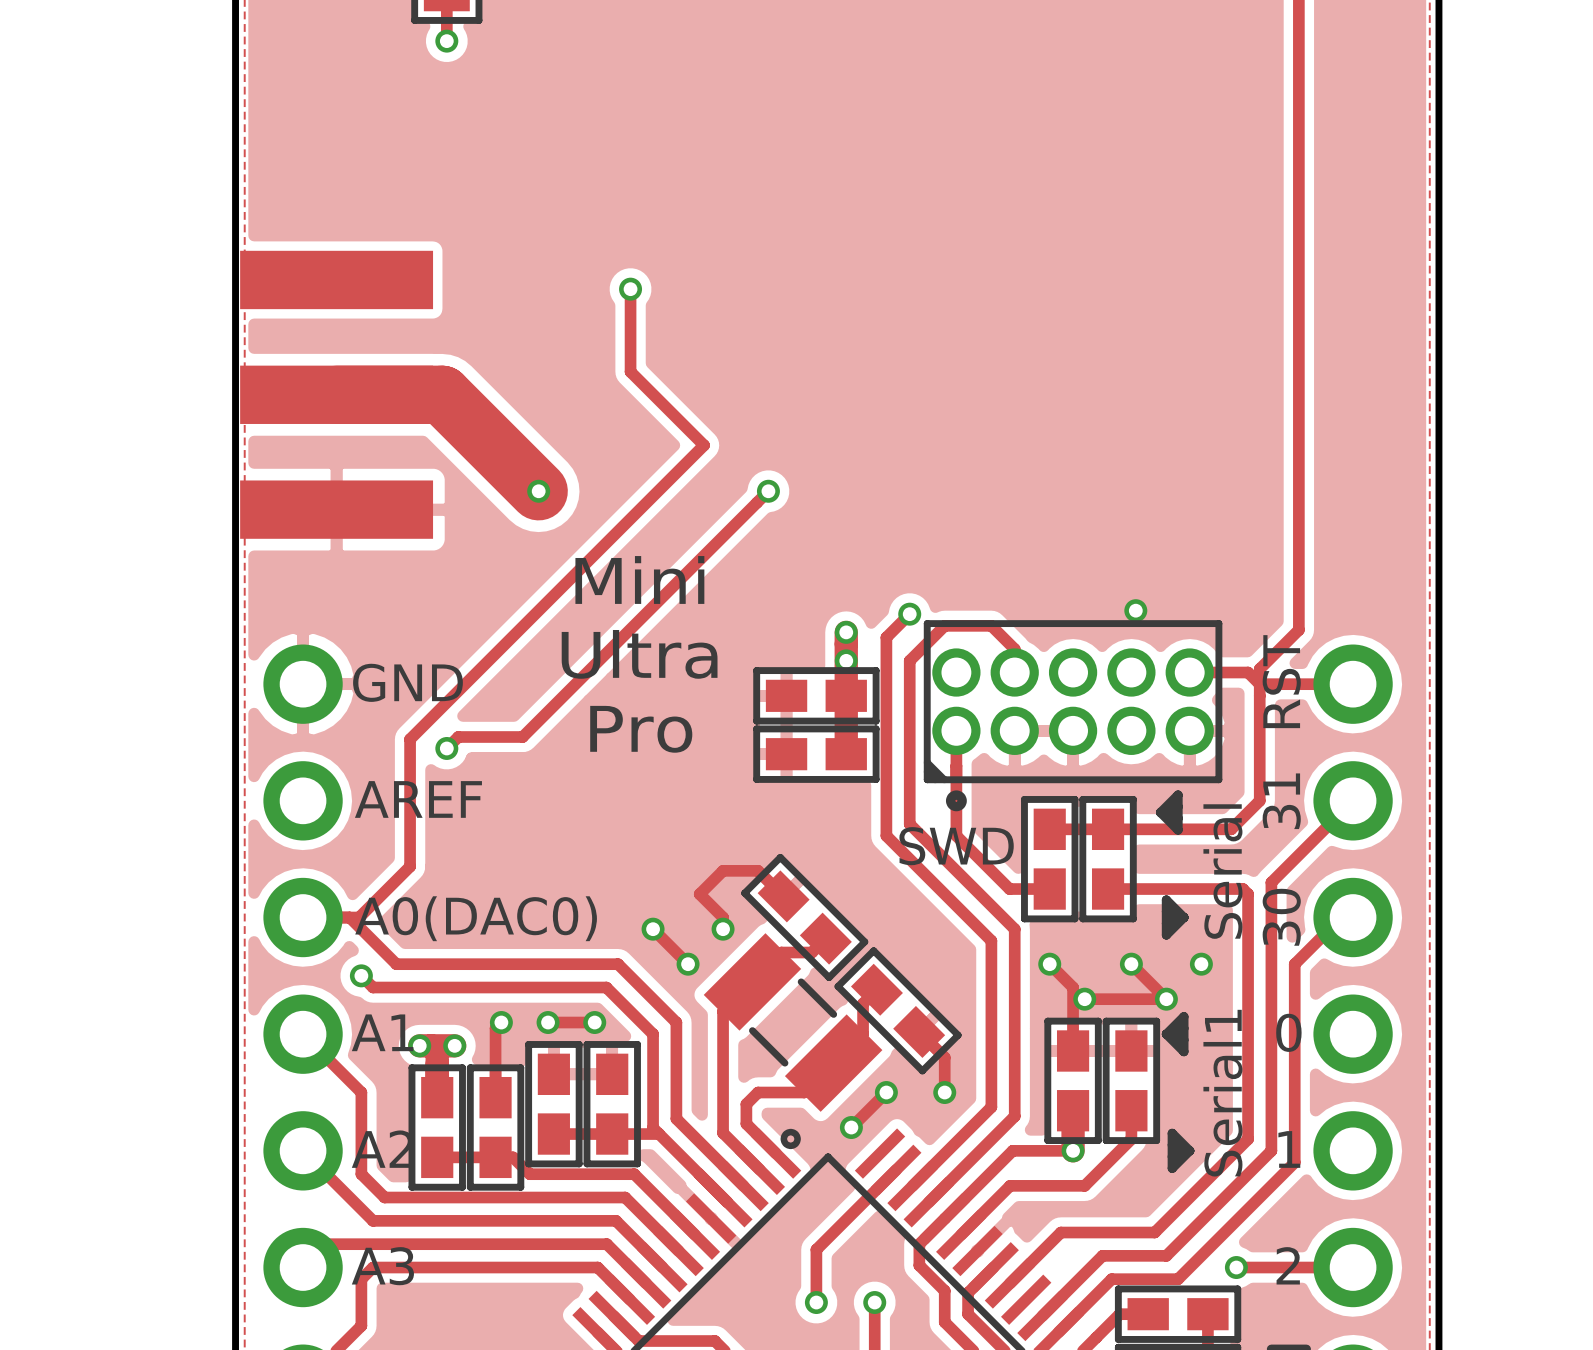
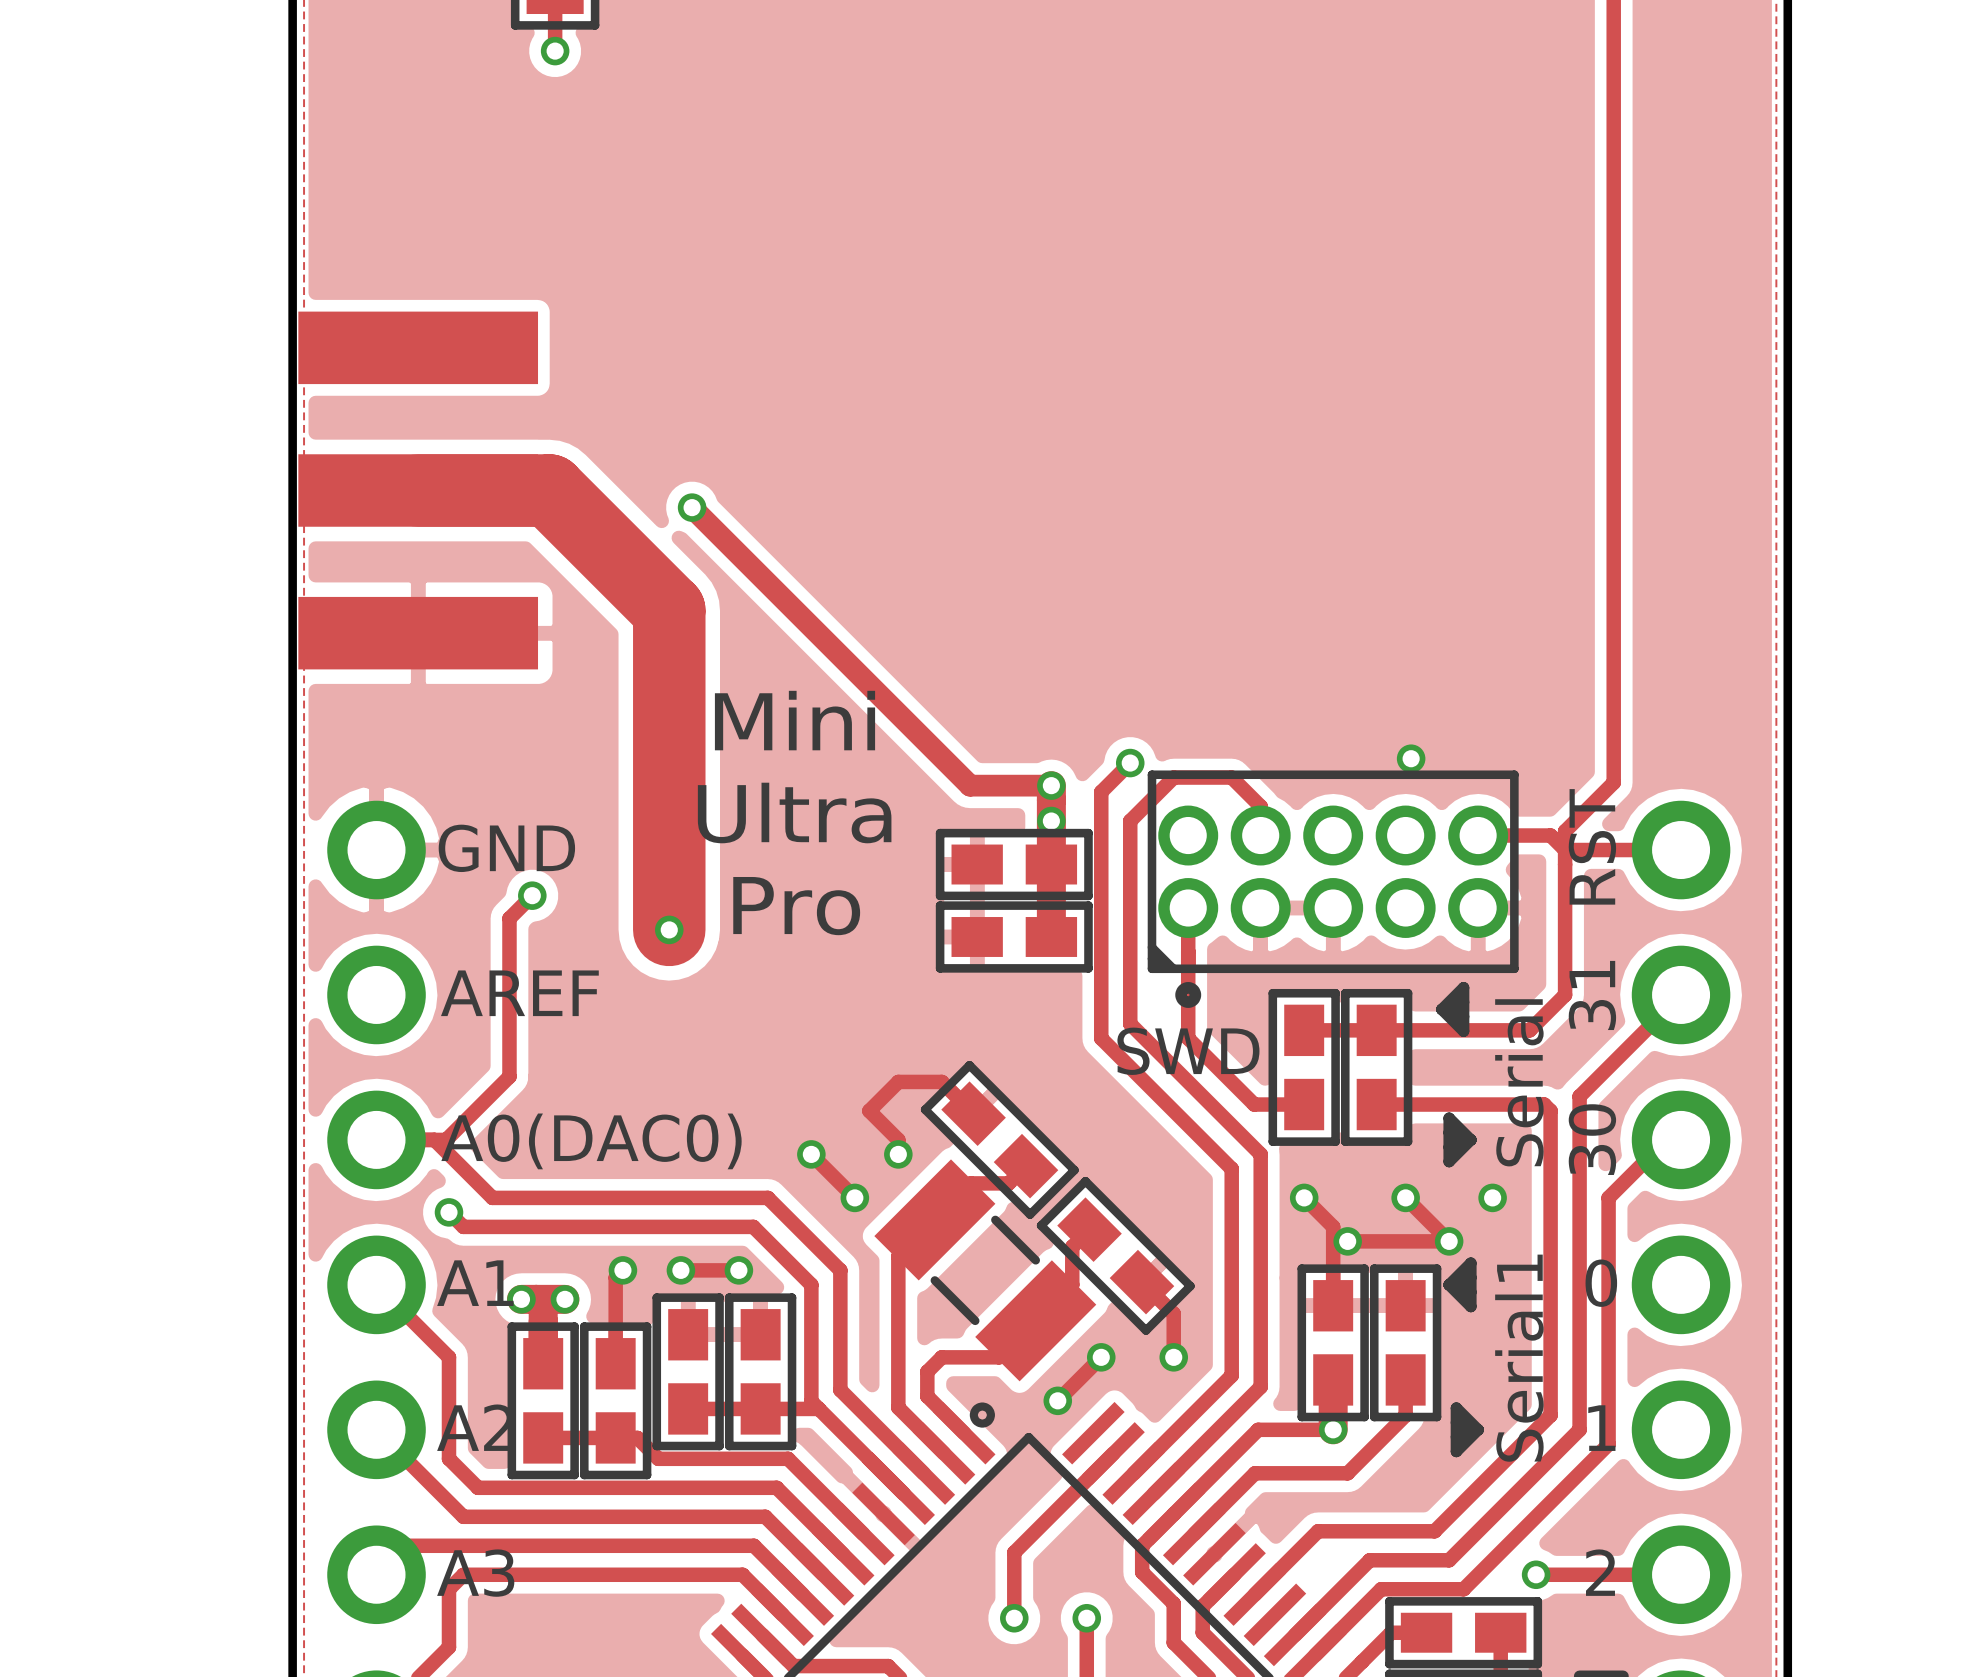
track: (630, 289) (630, 371) (704, 445) (428, 720) -> none
via: (630, 289) -> none
track: none -> (692, 507) (970, 785) (1051, 785)
via: none -> (692, 507)
track: none -> (669, 610) (669, 929)
via: (538, 491) -> none
track: (768, 491) (522, 737) (458, 737) (446, 748) -> none
via: (768, 491) -> none
via position: (446, 748) -> (532, 895)
via: none -> (669, 929)

